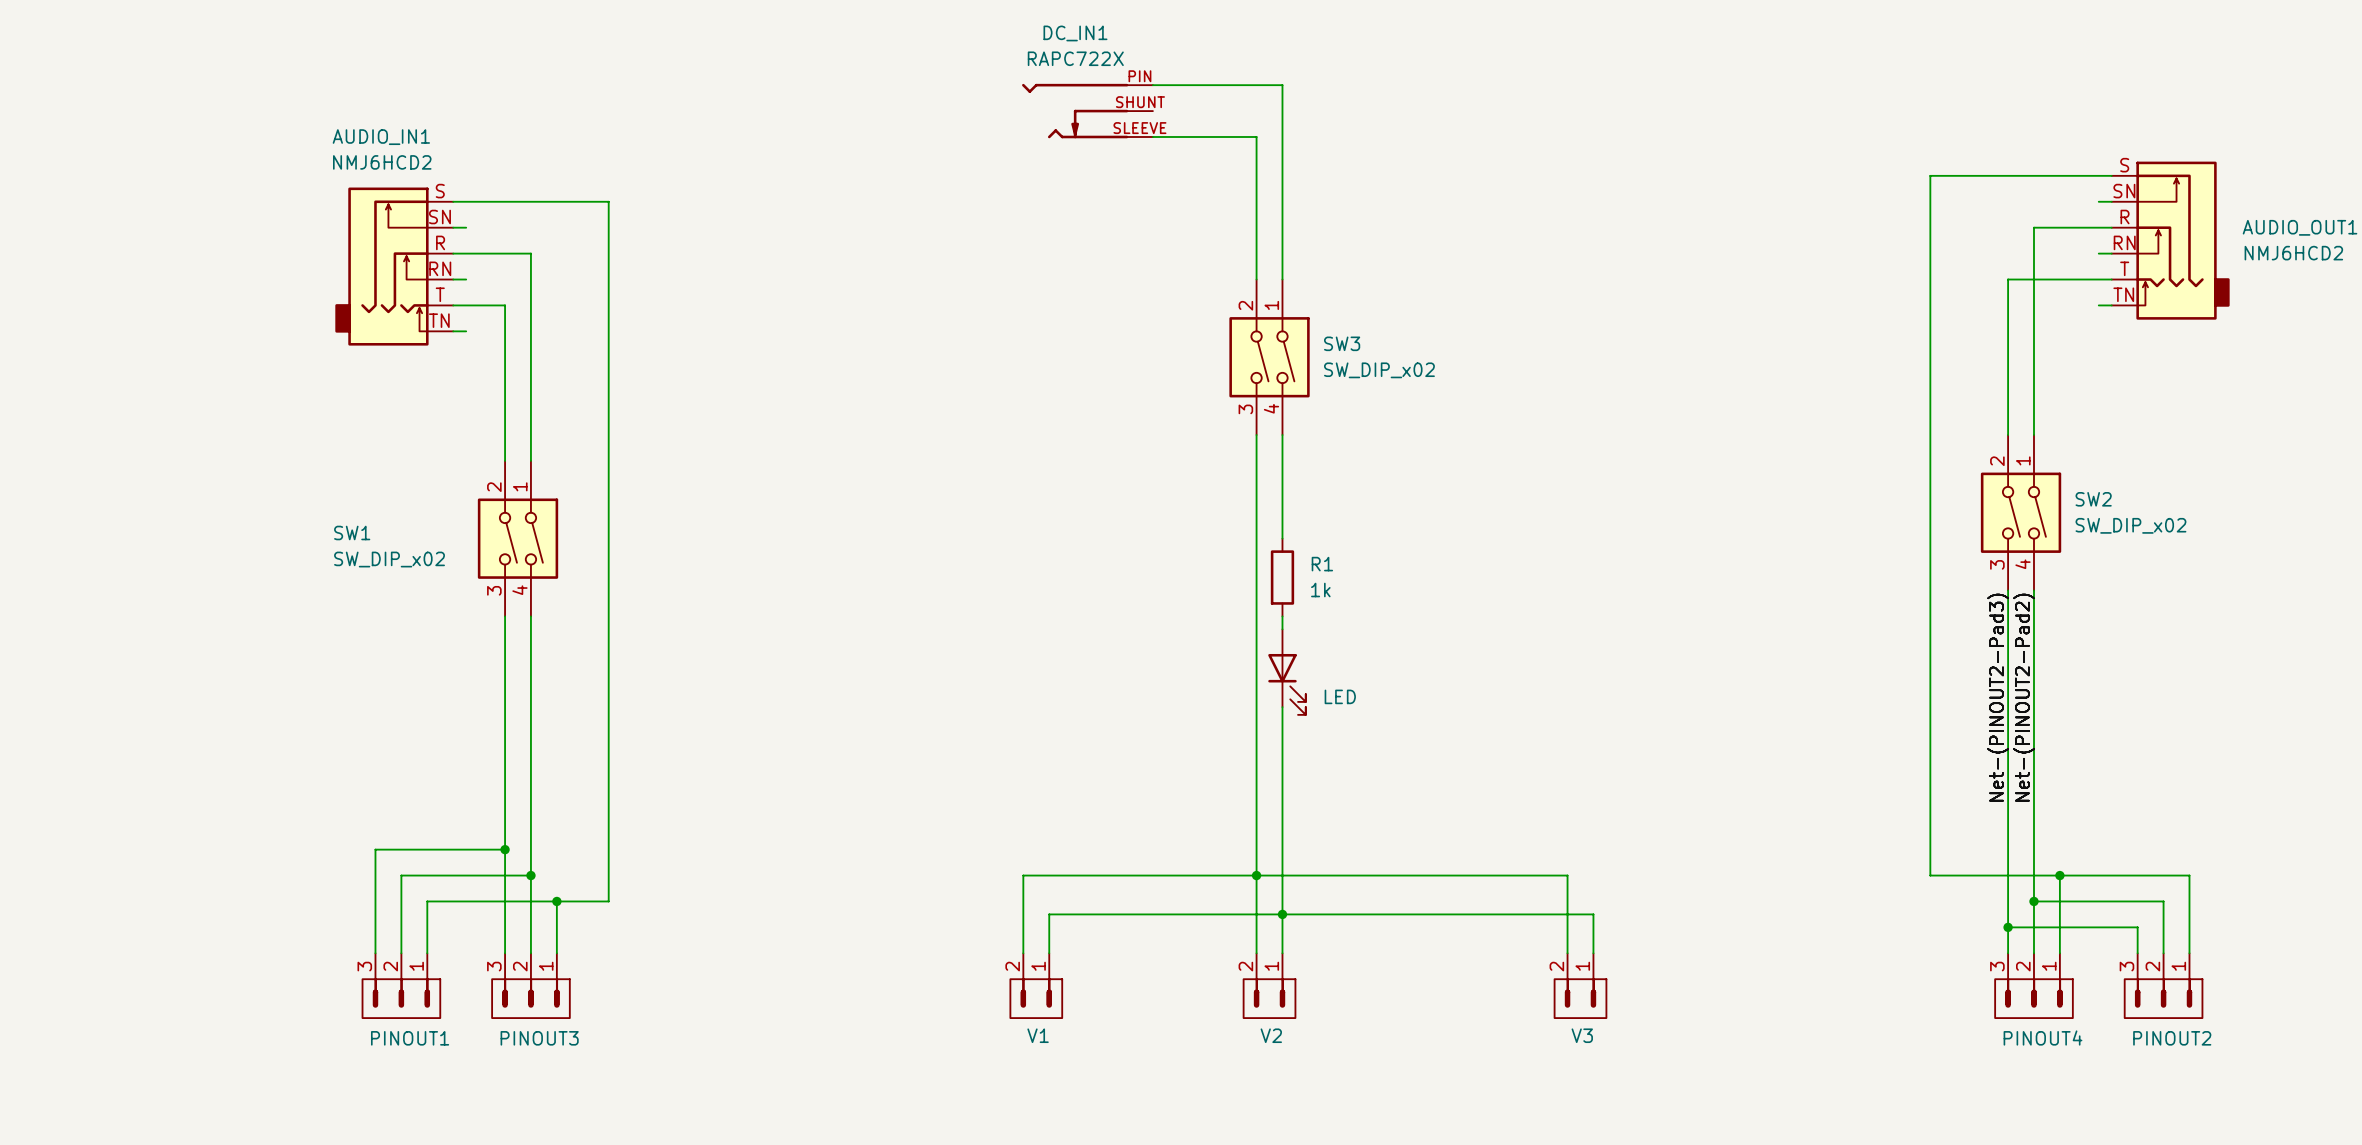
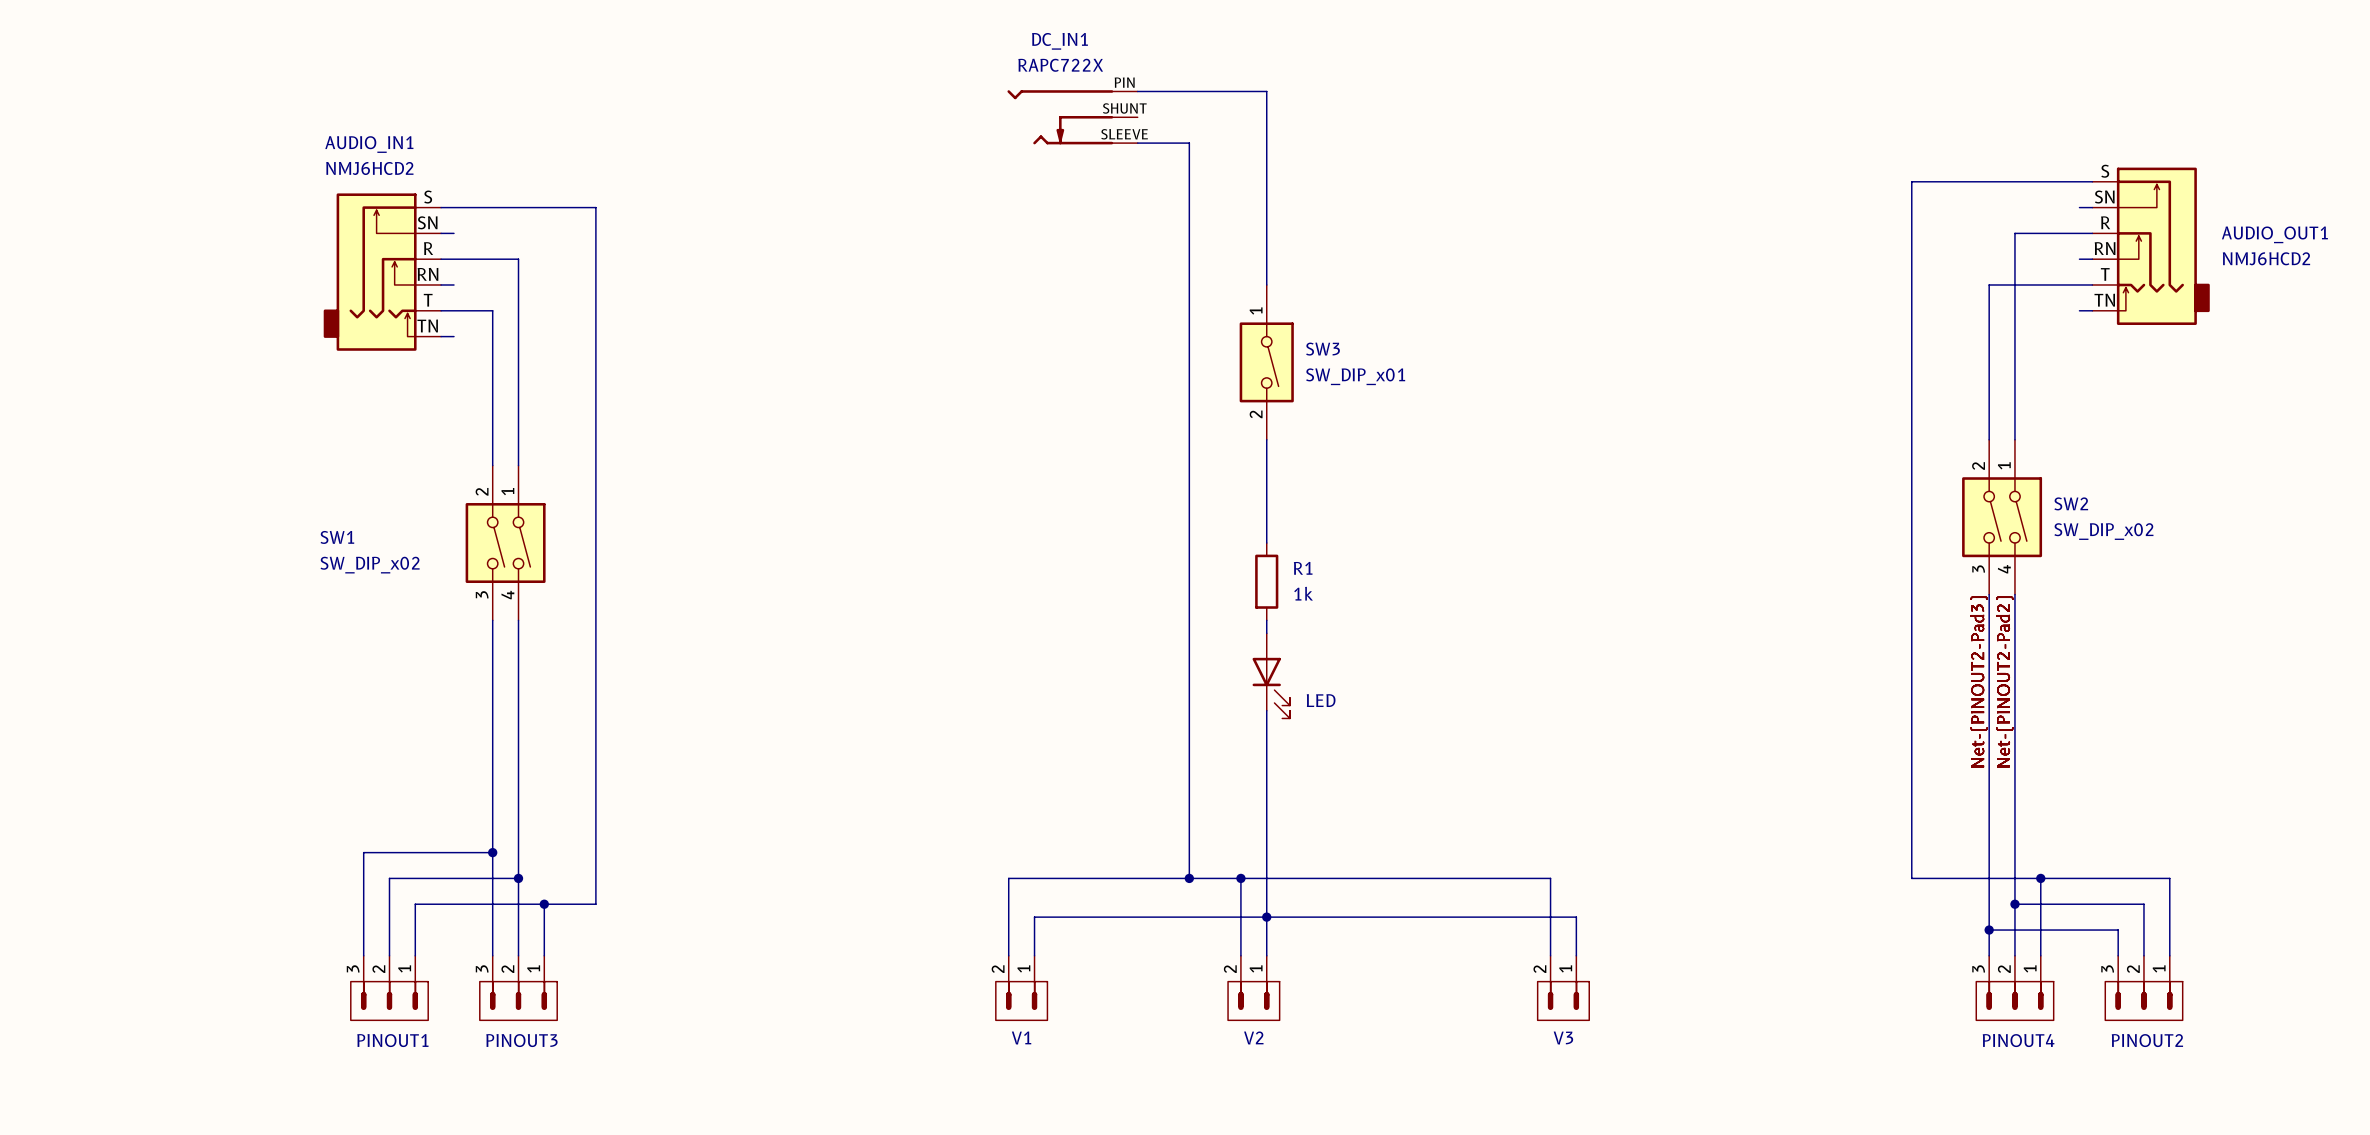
wire: (1204, 136) (1256, 136) (1256, 279) -> (1189, 143) (1189, 878)
SW3 symbol: [1229, 279, 1310, 436] -> [1239, 284, 1294, 440]
SW3 value: SW_DIP_x02 (1379, 370) -> SW_DIP_x01 (1355, 376)
wire: (1256, 435) (1256, 875) -> none
junction: none -> (1189, 878)

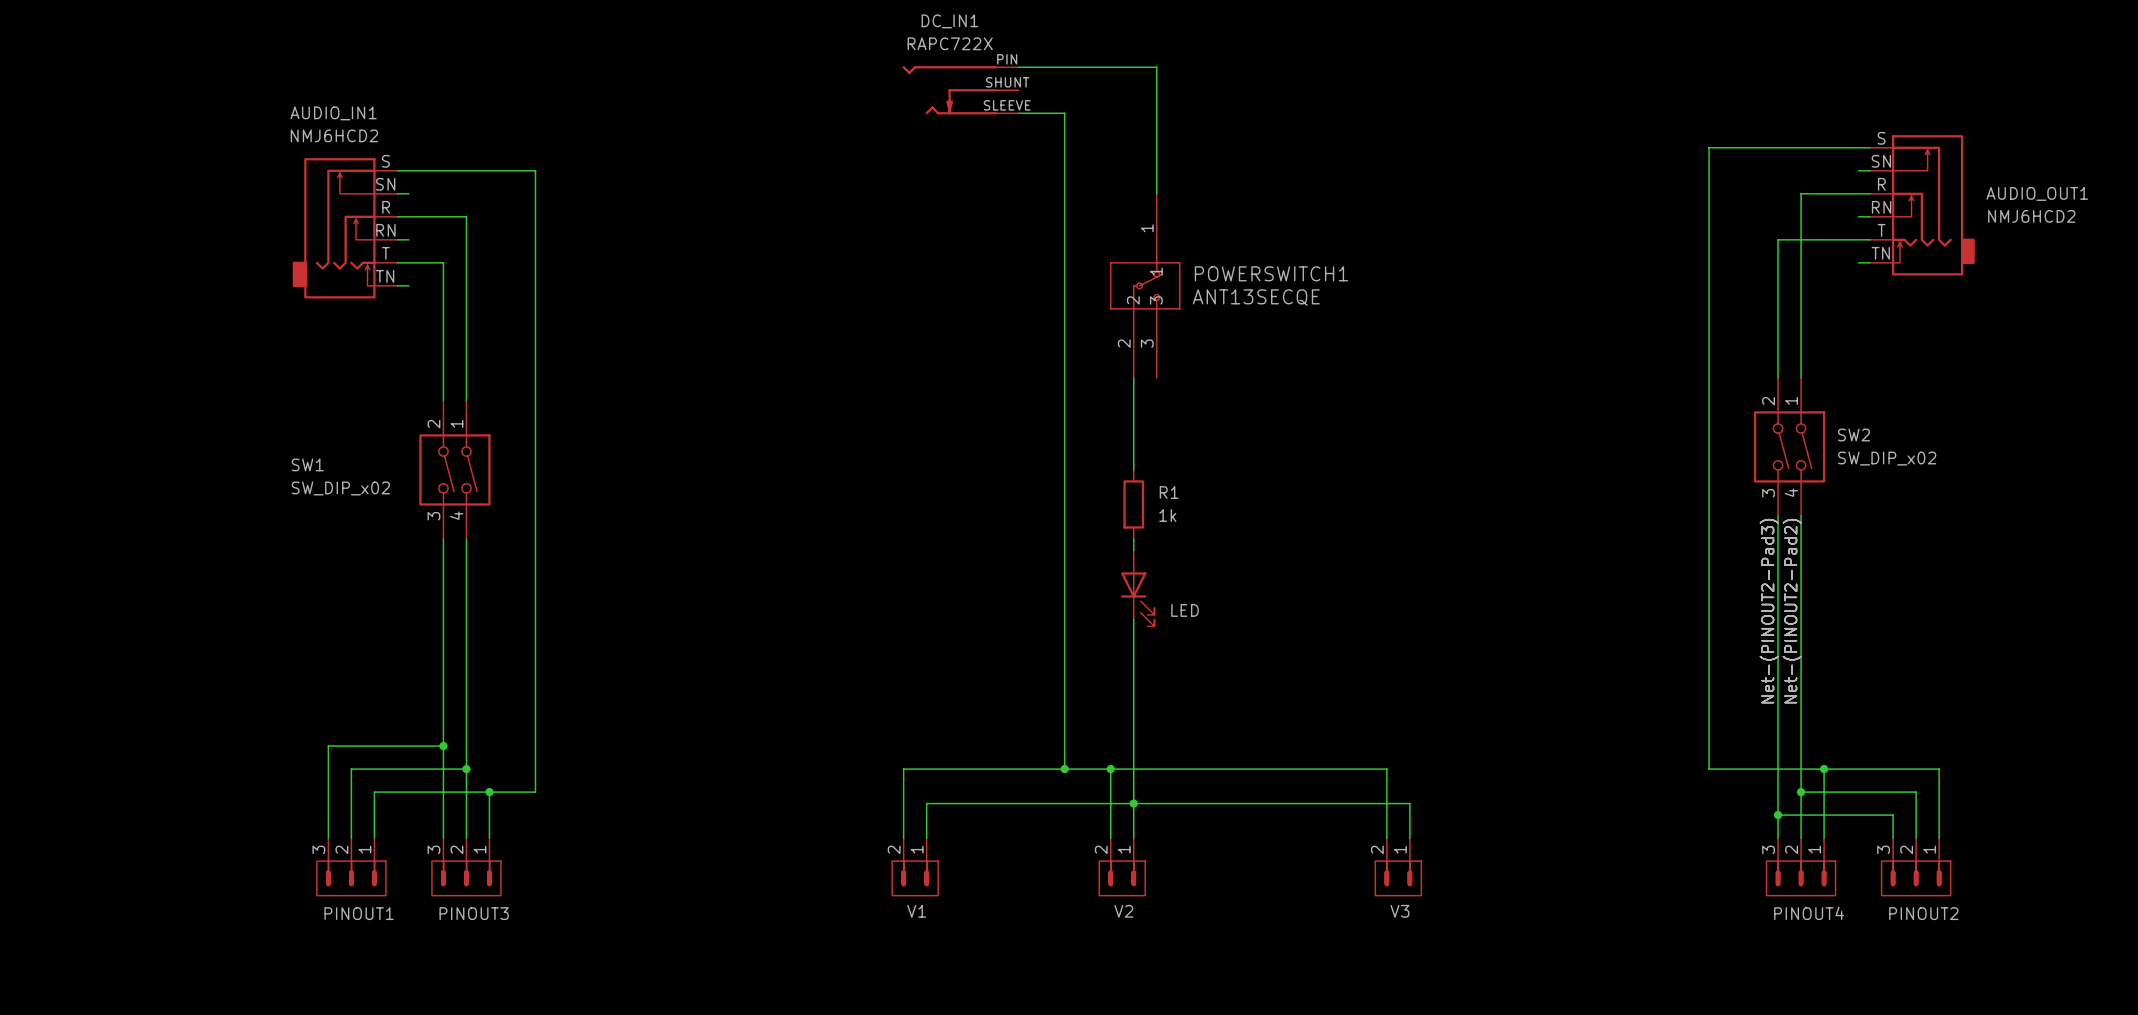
wire: (1266, 91) (1266, 284) -> (1133, 67) (1156, 67) (1156, 193)
POWERSWITCH1: none -> ANT13SECQE (1145, 285)
SW3: SW_DIP_x01 (1266, 362) -> none

